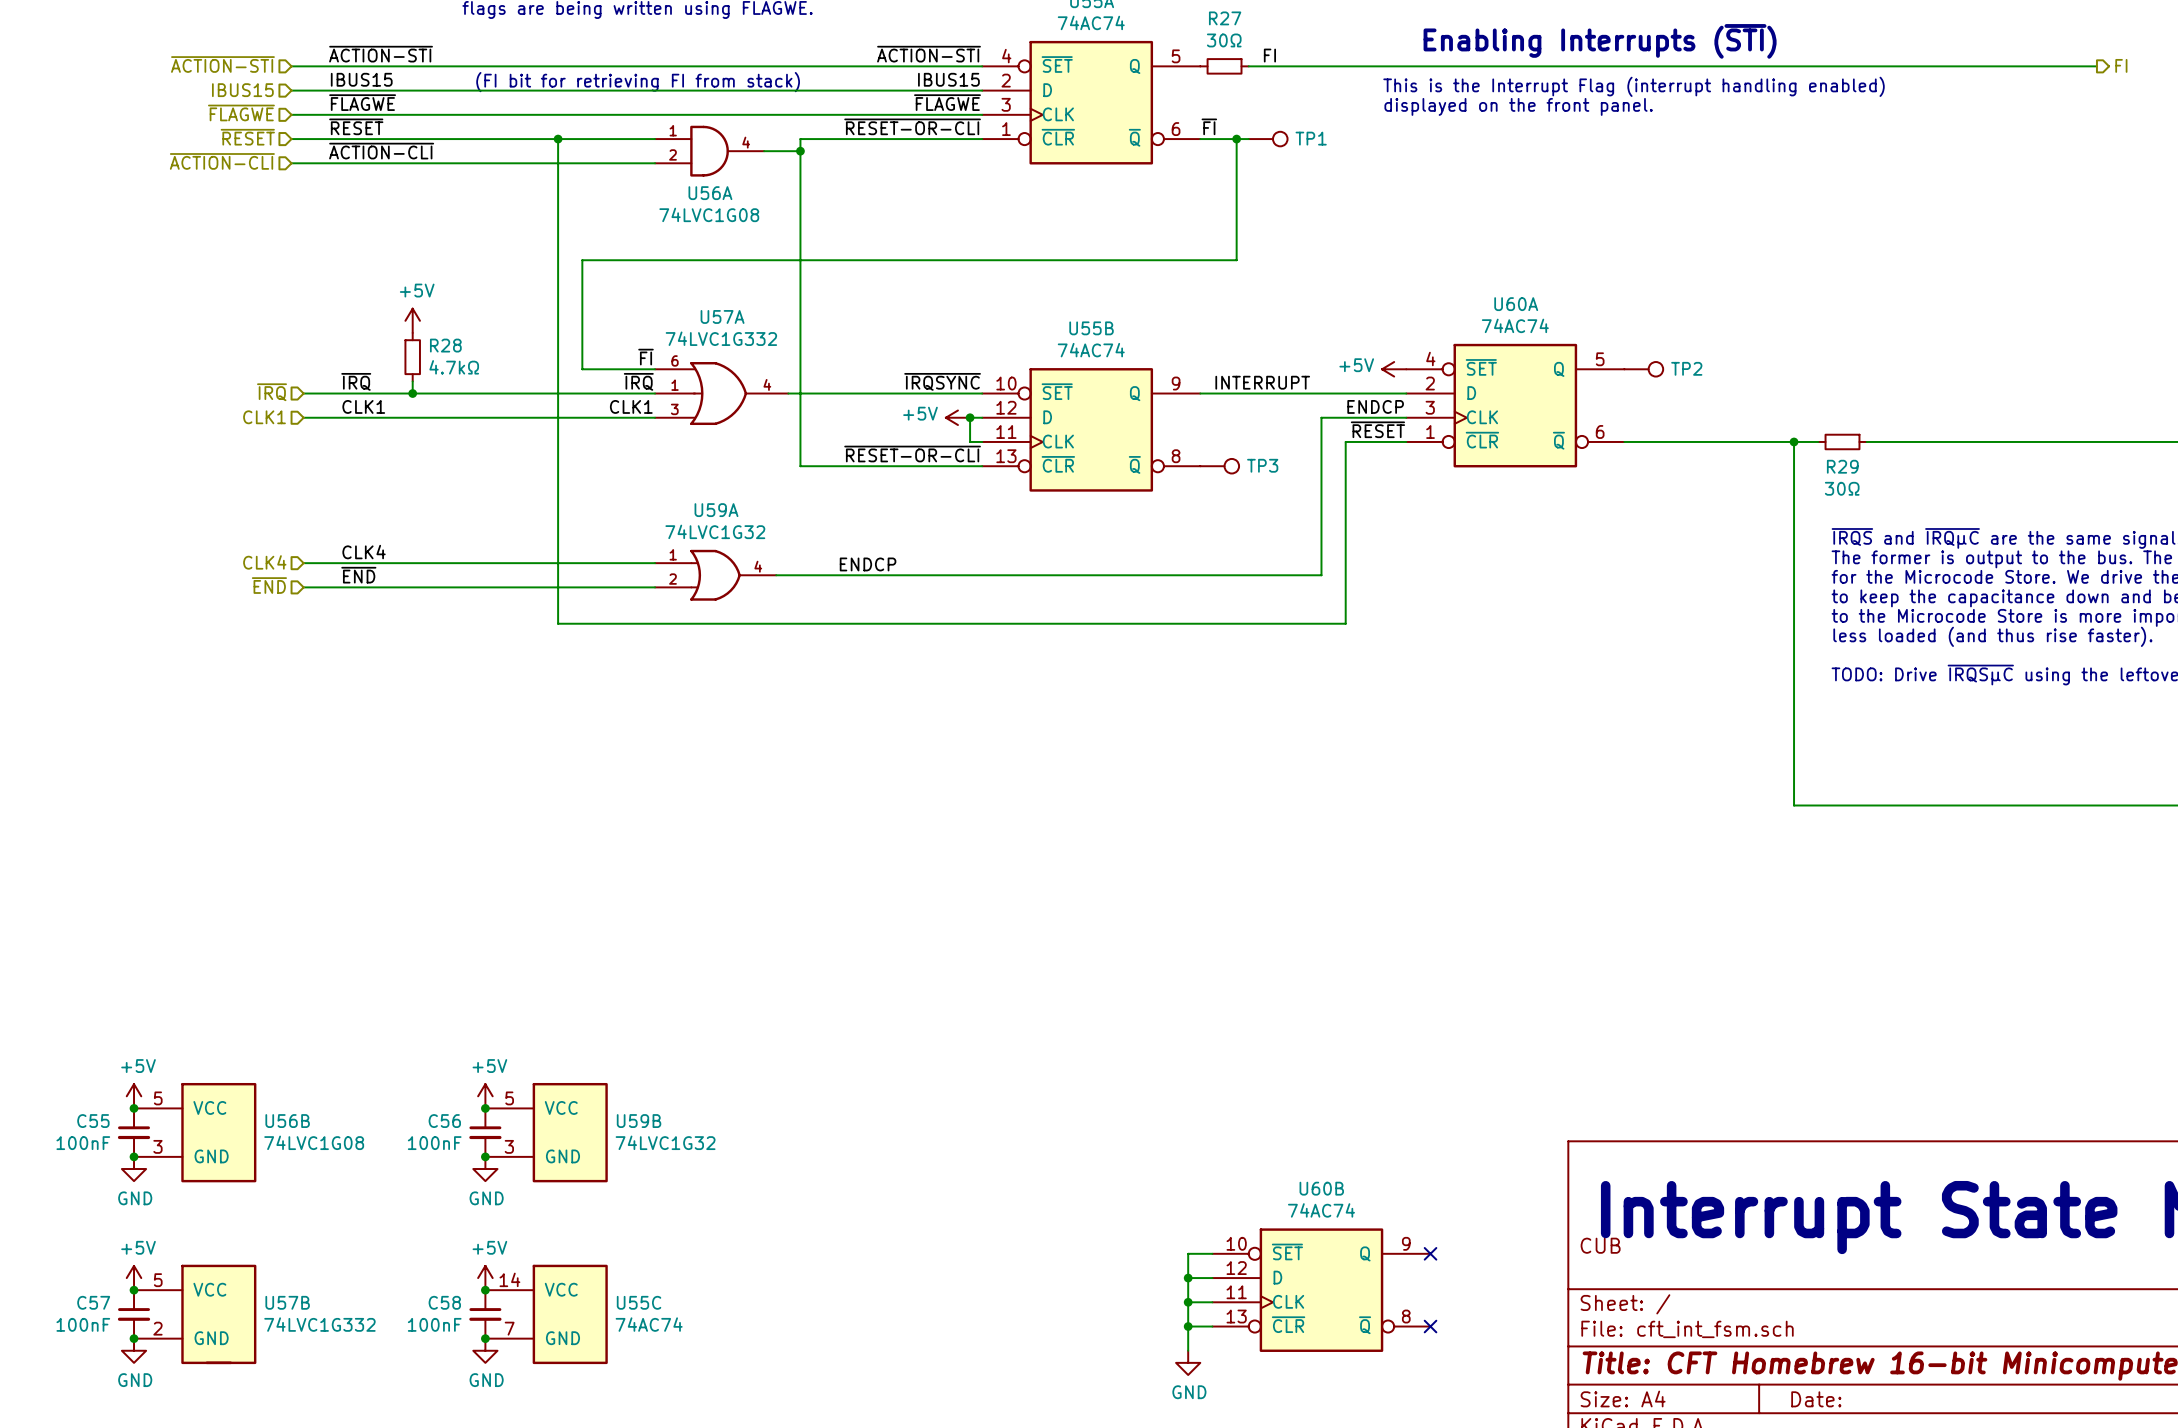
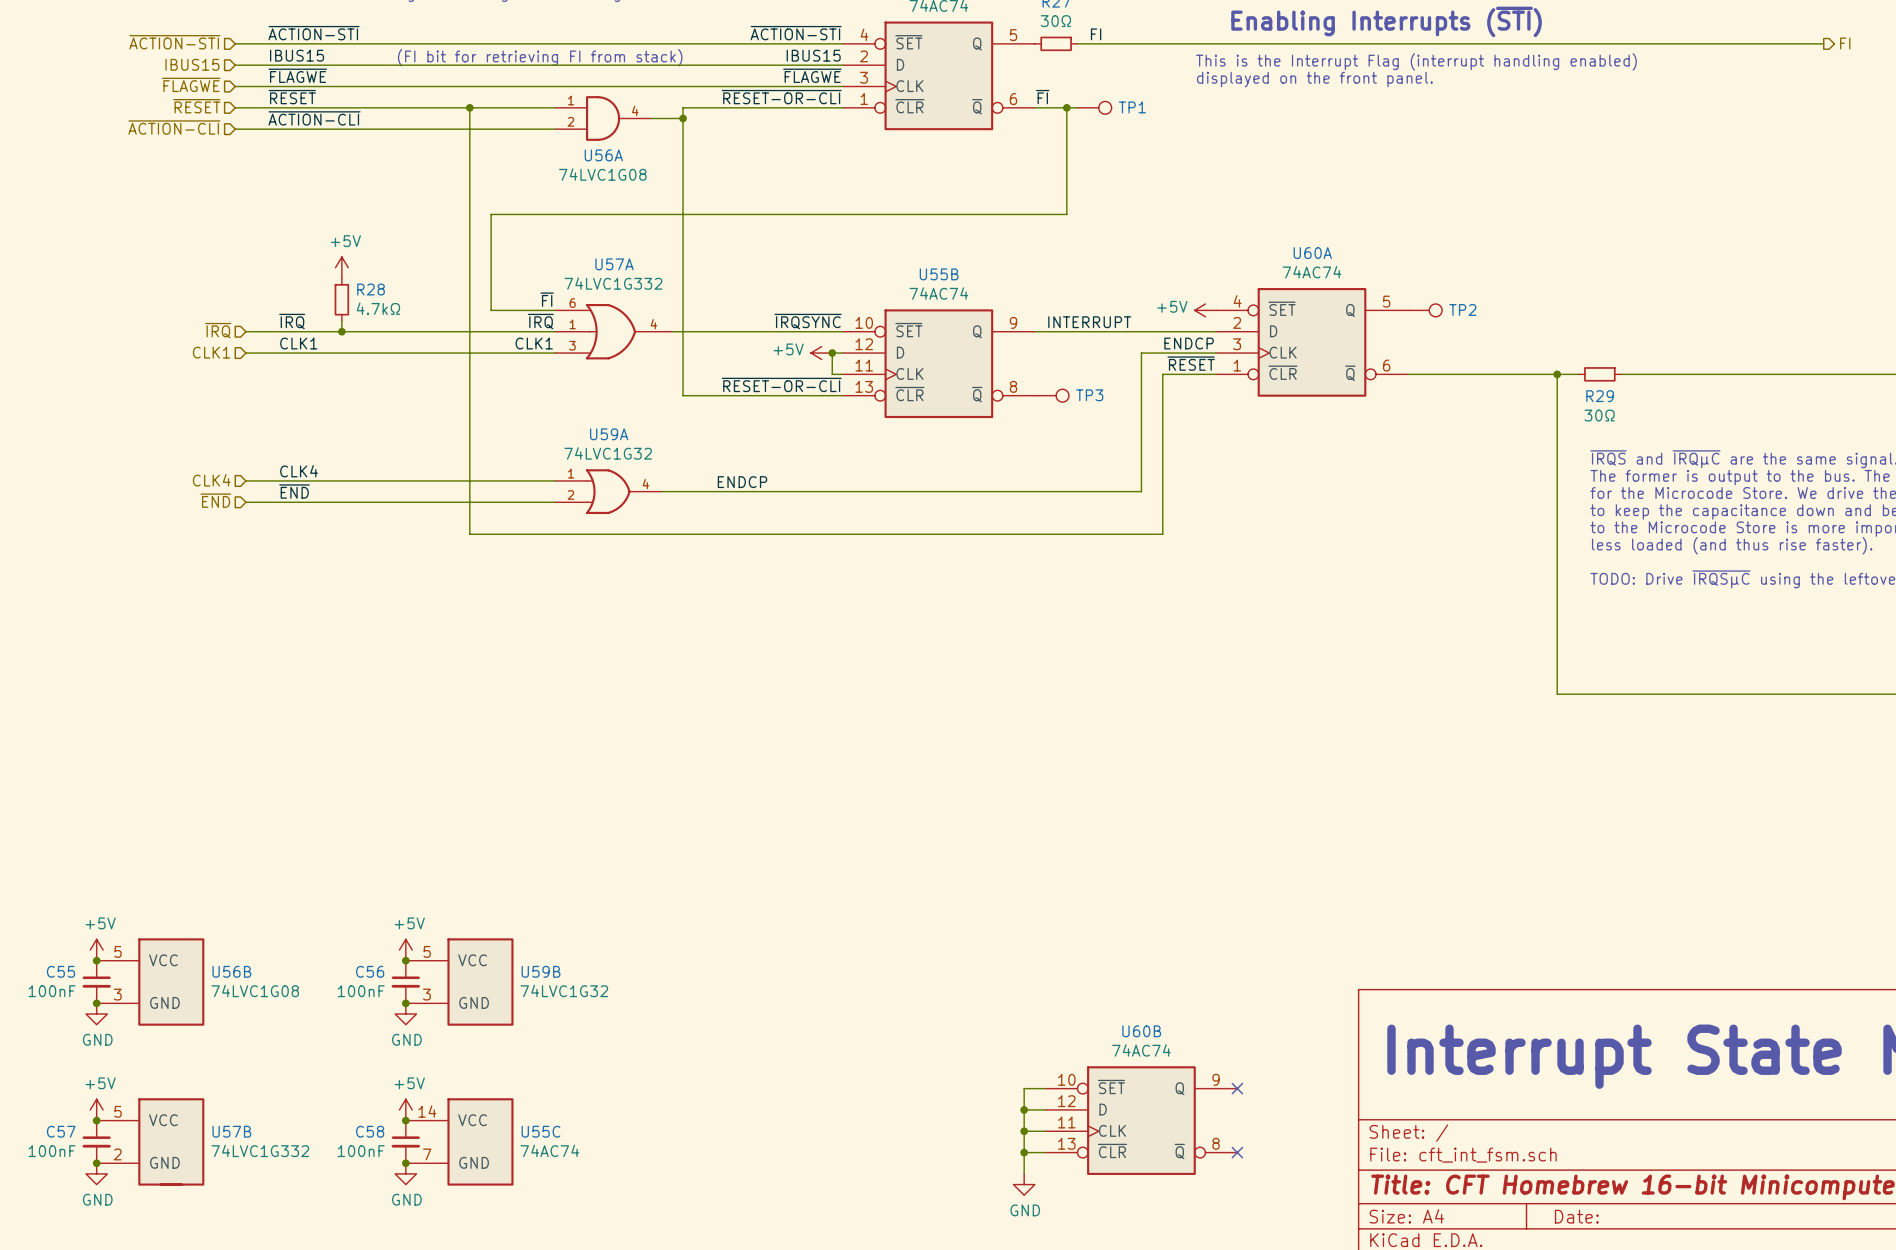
title block: CUB (1600, 1245) -> none

